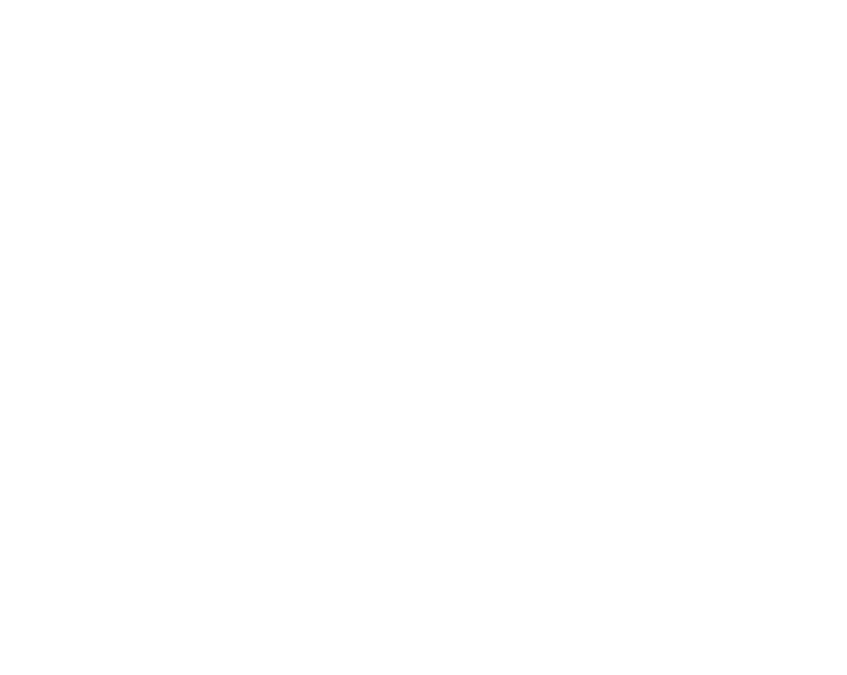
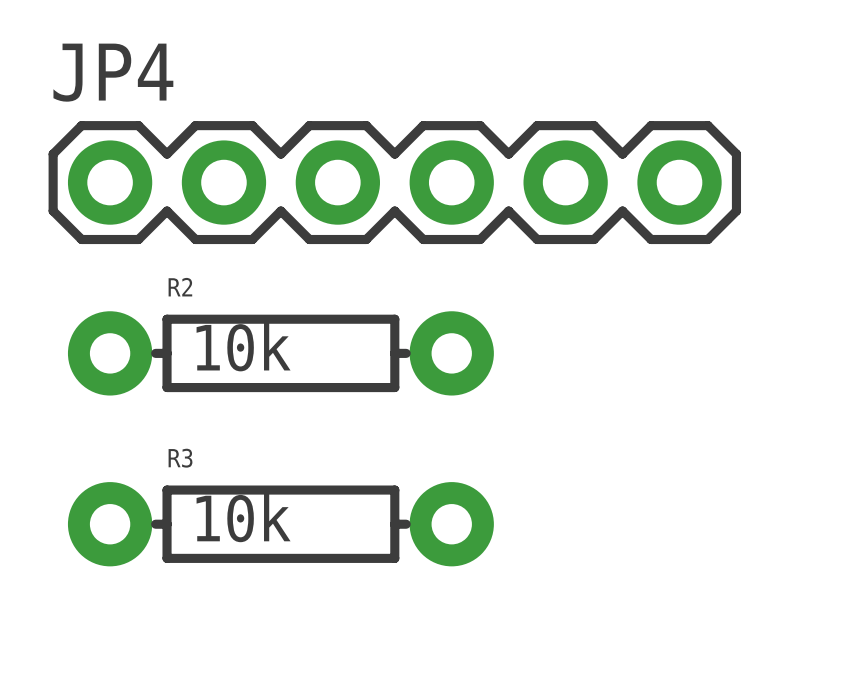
JP4: none -> (394, 182)
R2: none -> 10k (280, 353)
R3: none -> 10k (280, 524)

